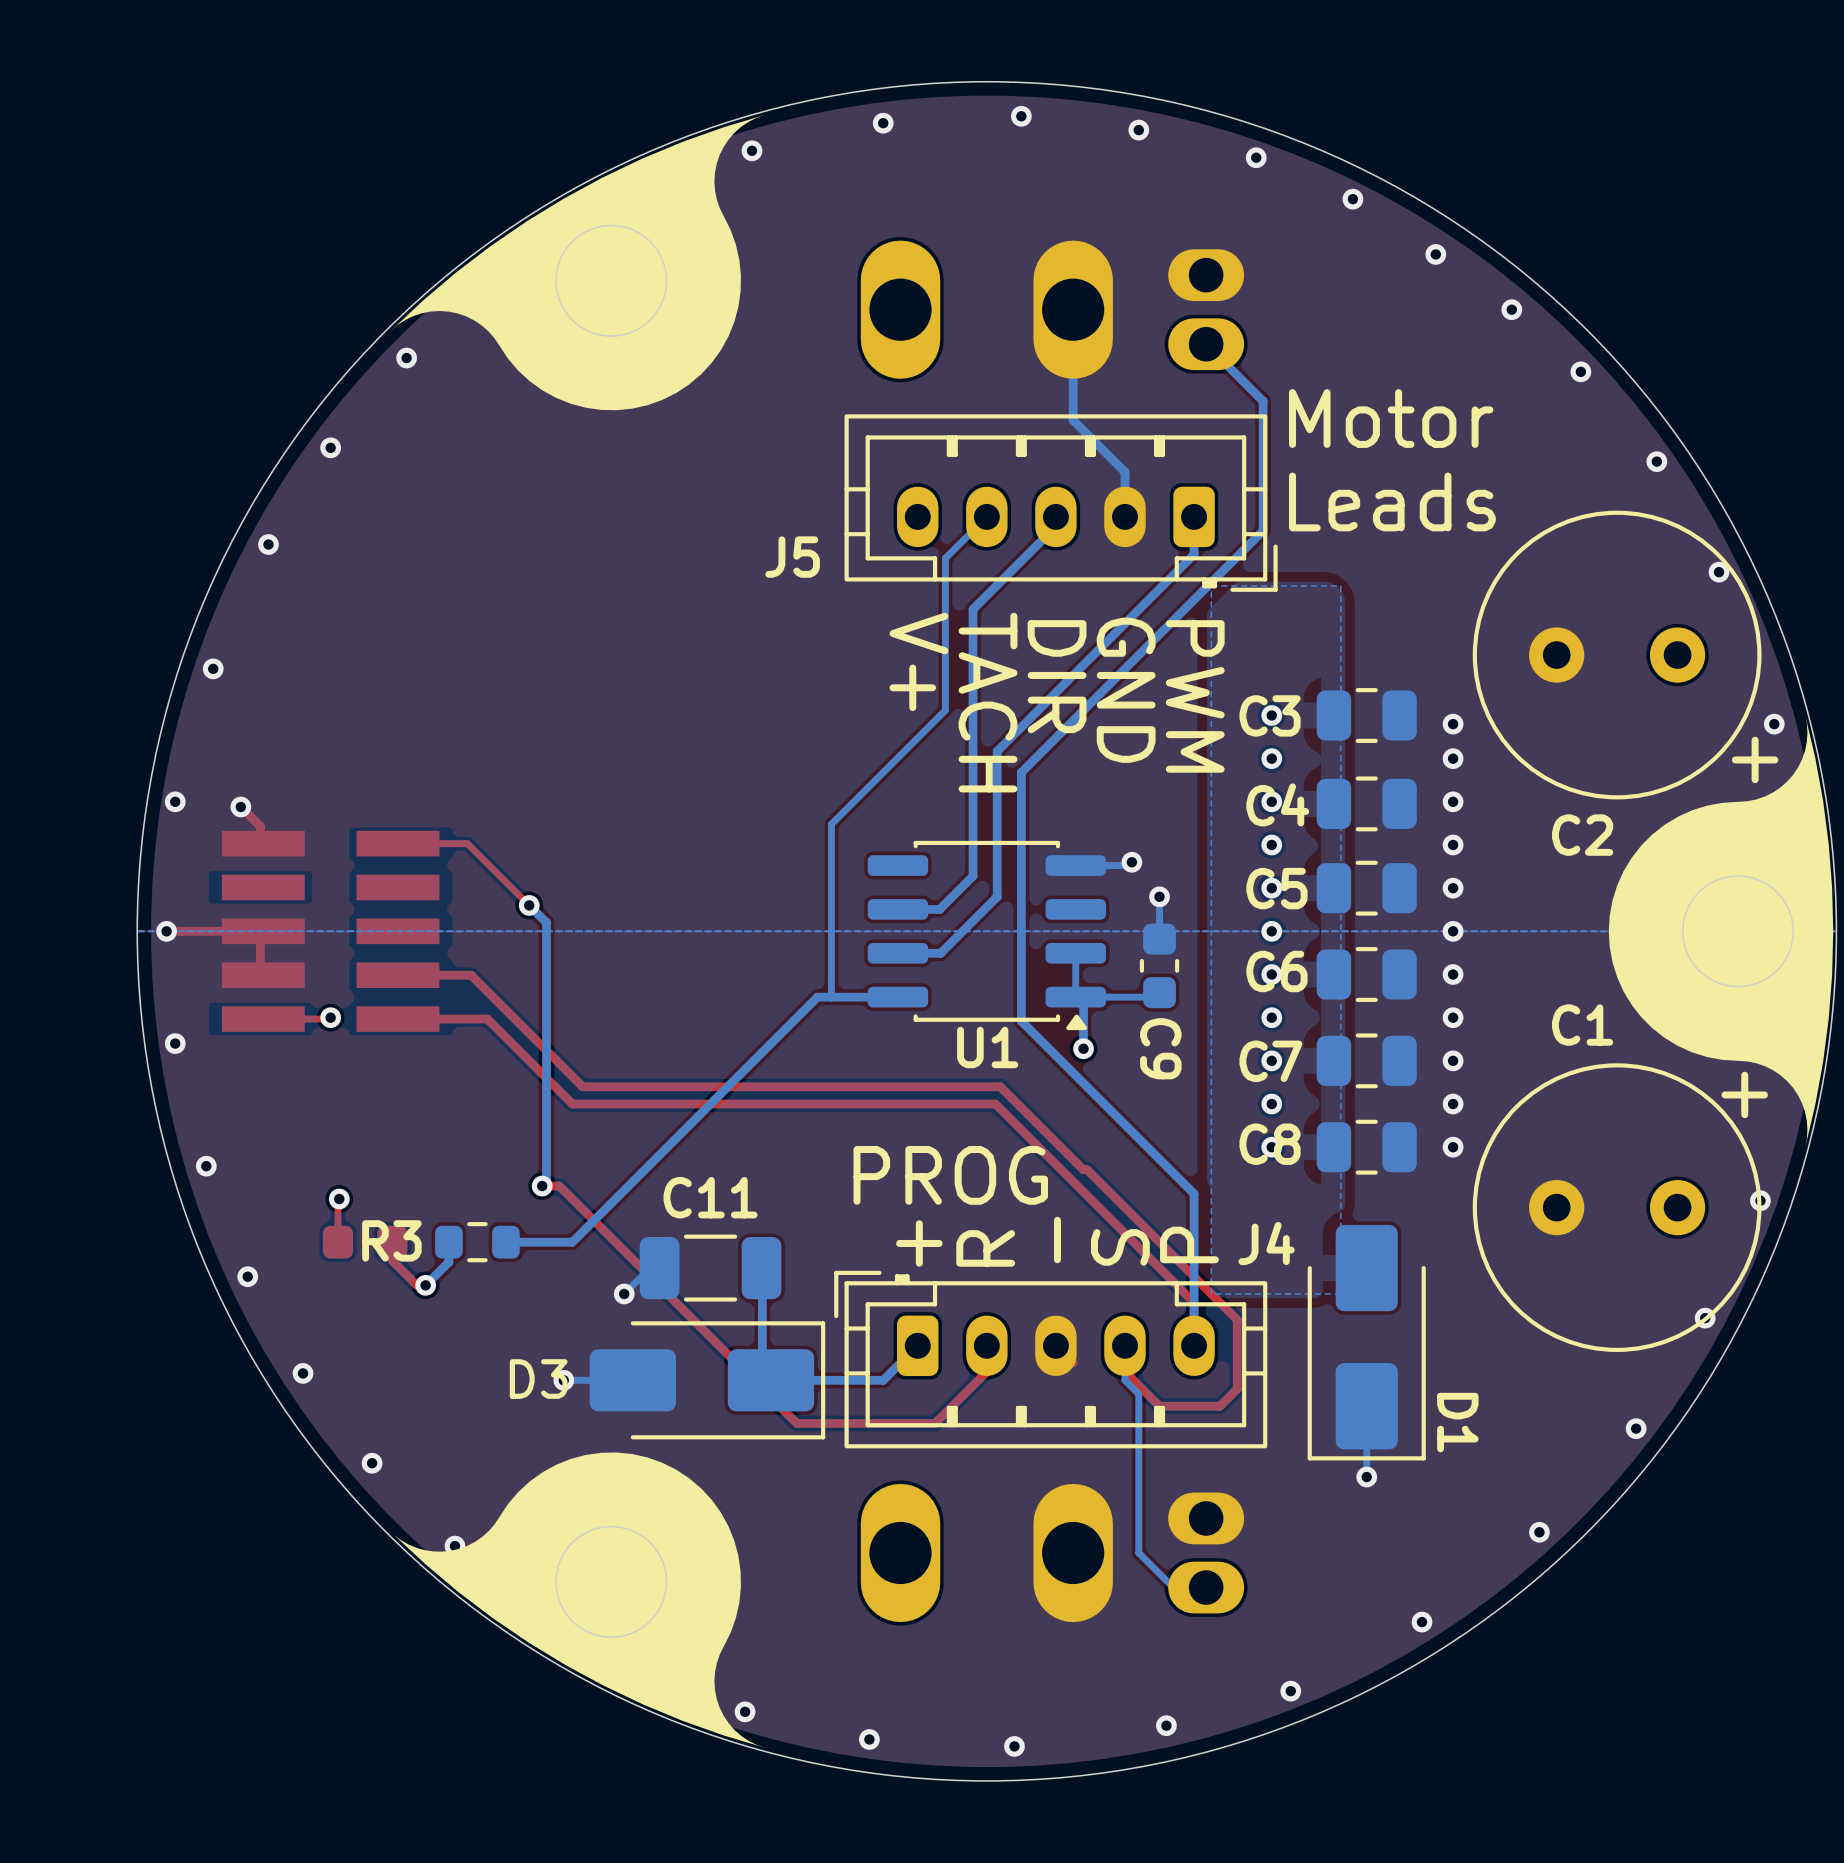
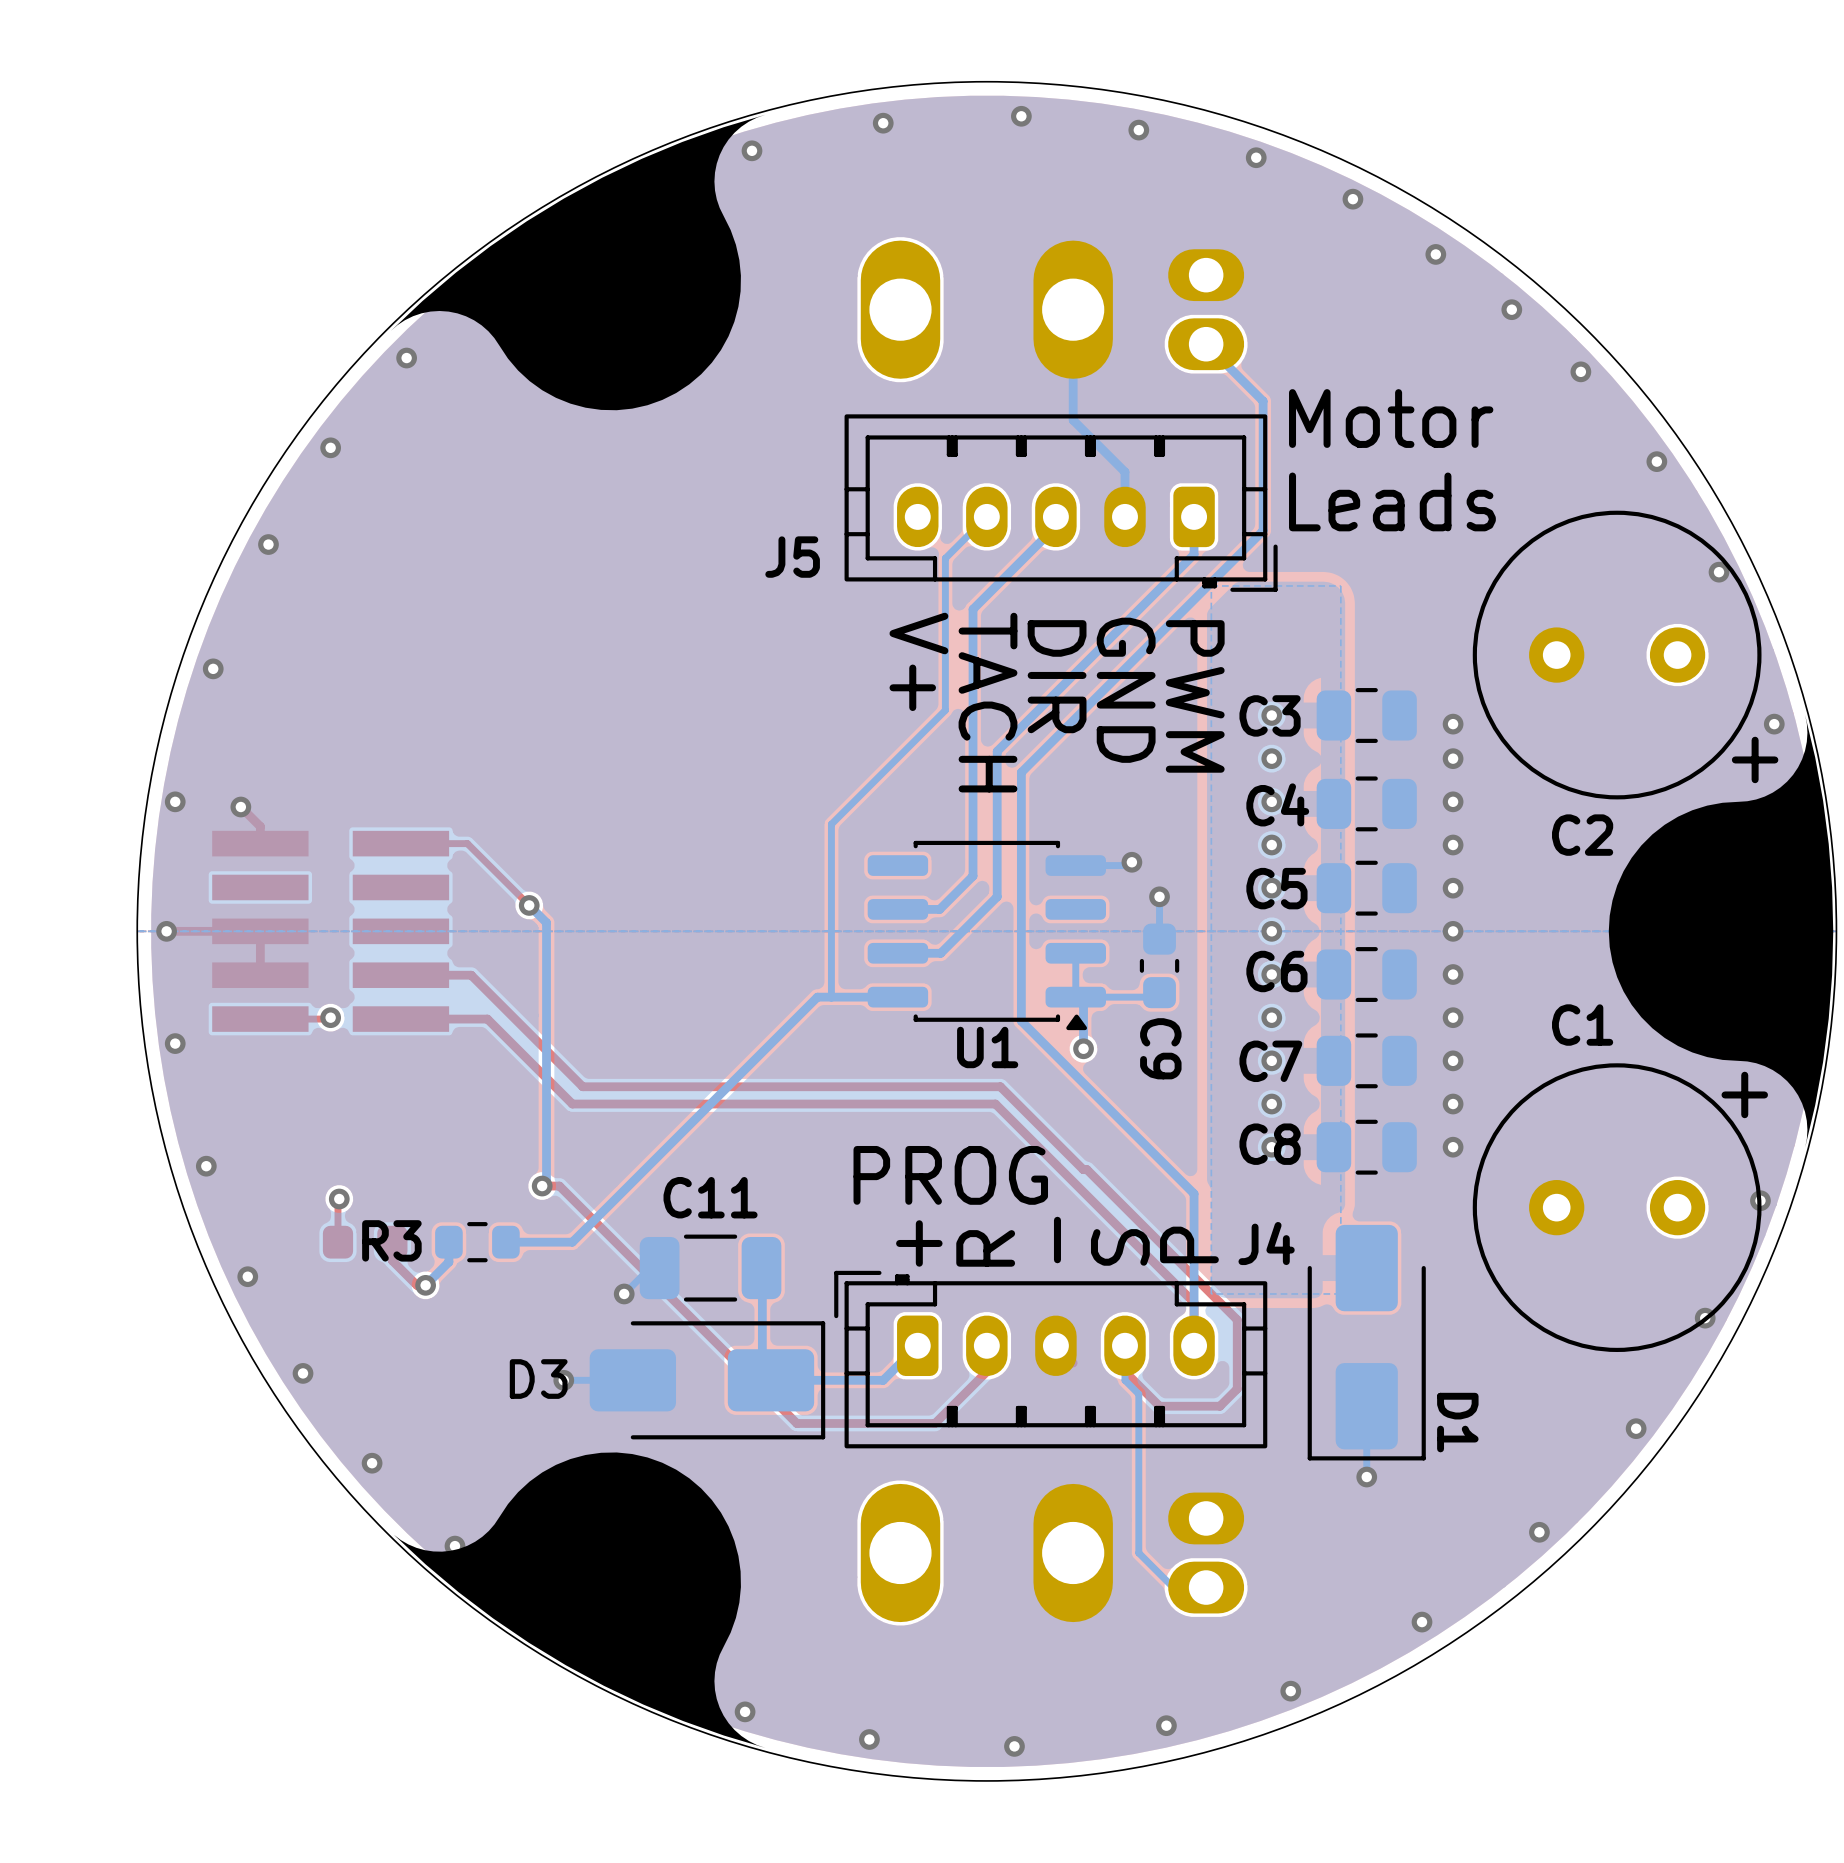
part footprint: [221, 830, 440, 1032] -> [212, 830, 450, 1032]

